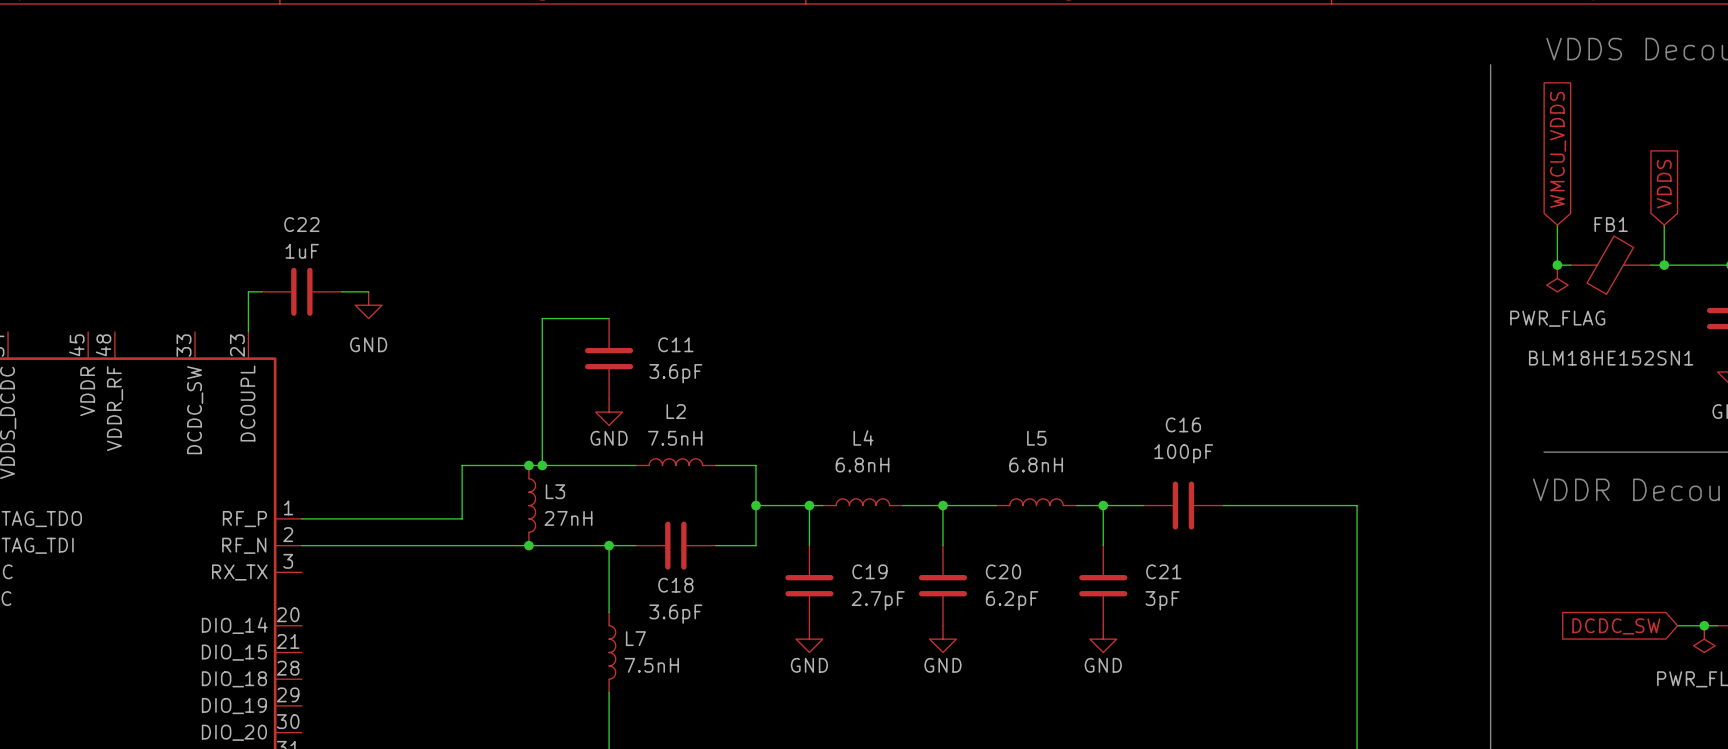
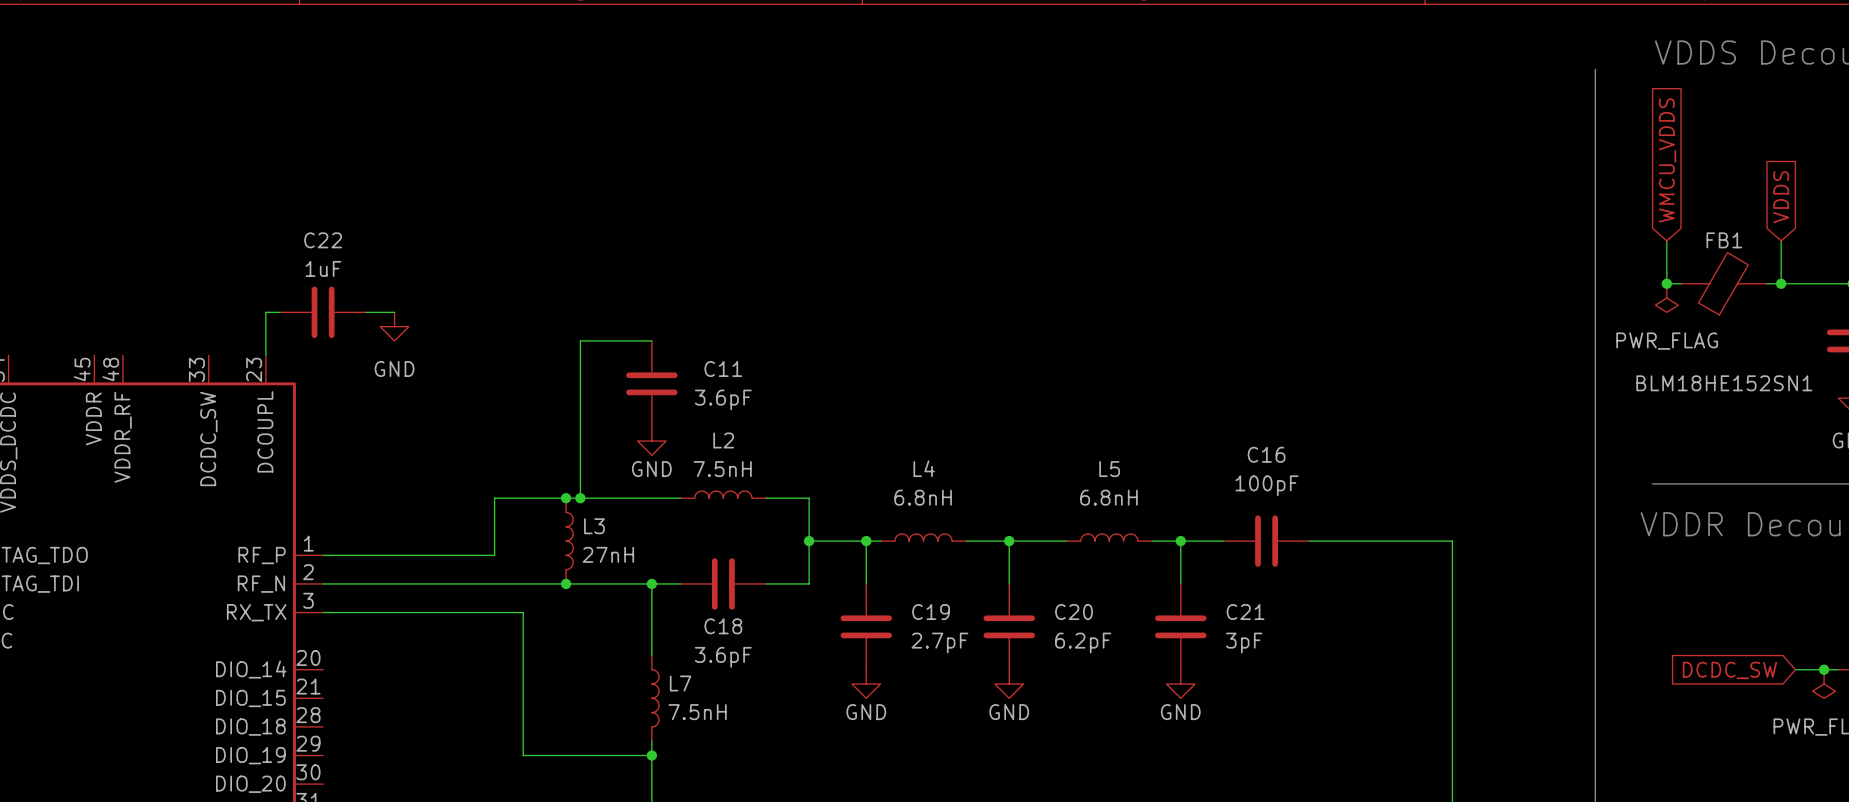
wire: none -> (323, 612) (523, 612) (523, 755) (651, 755)
junction: none -> (651, 755)

